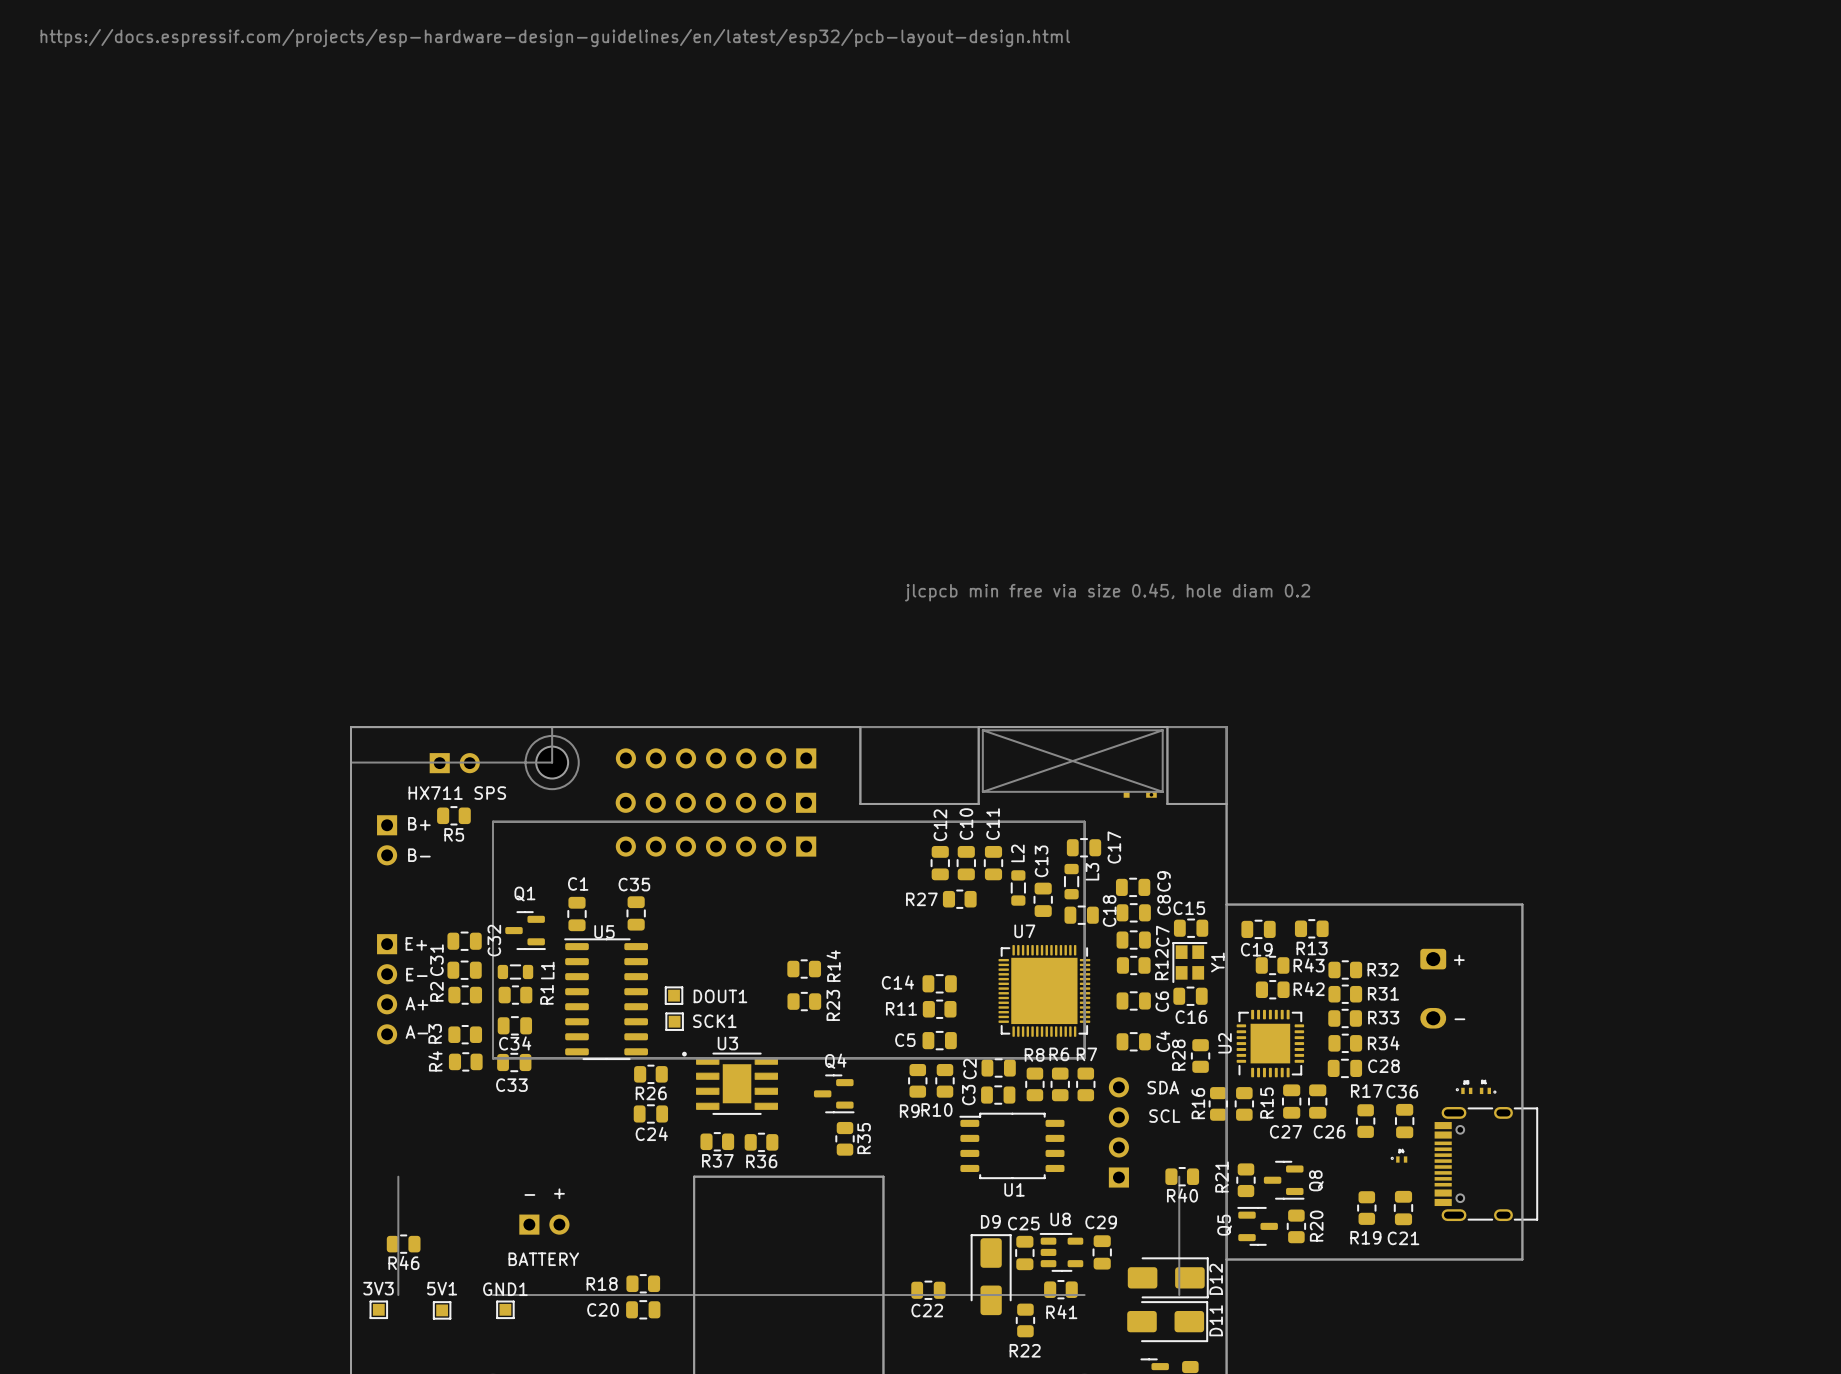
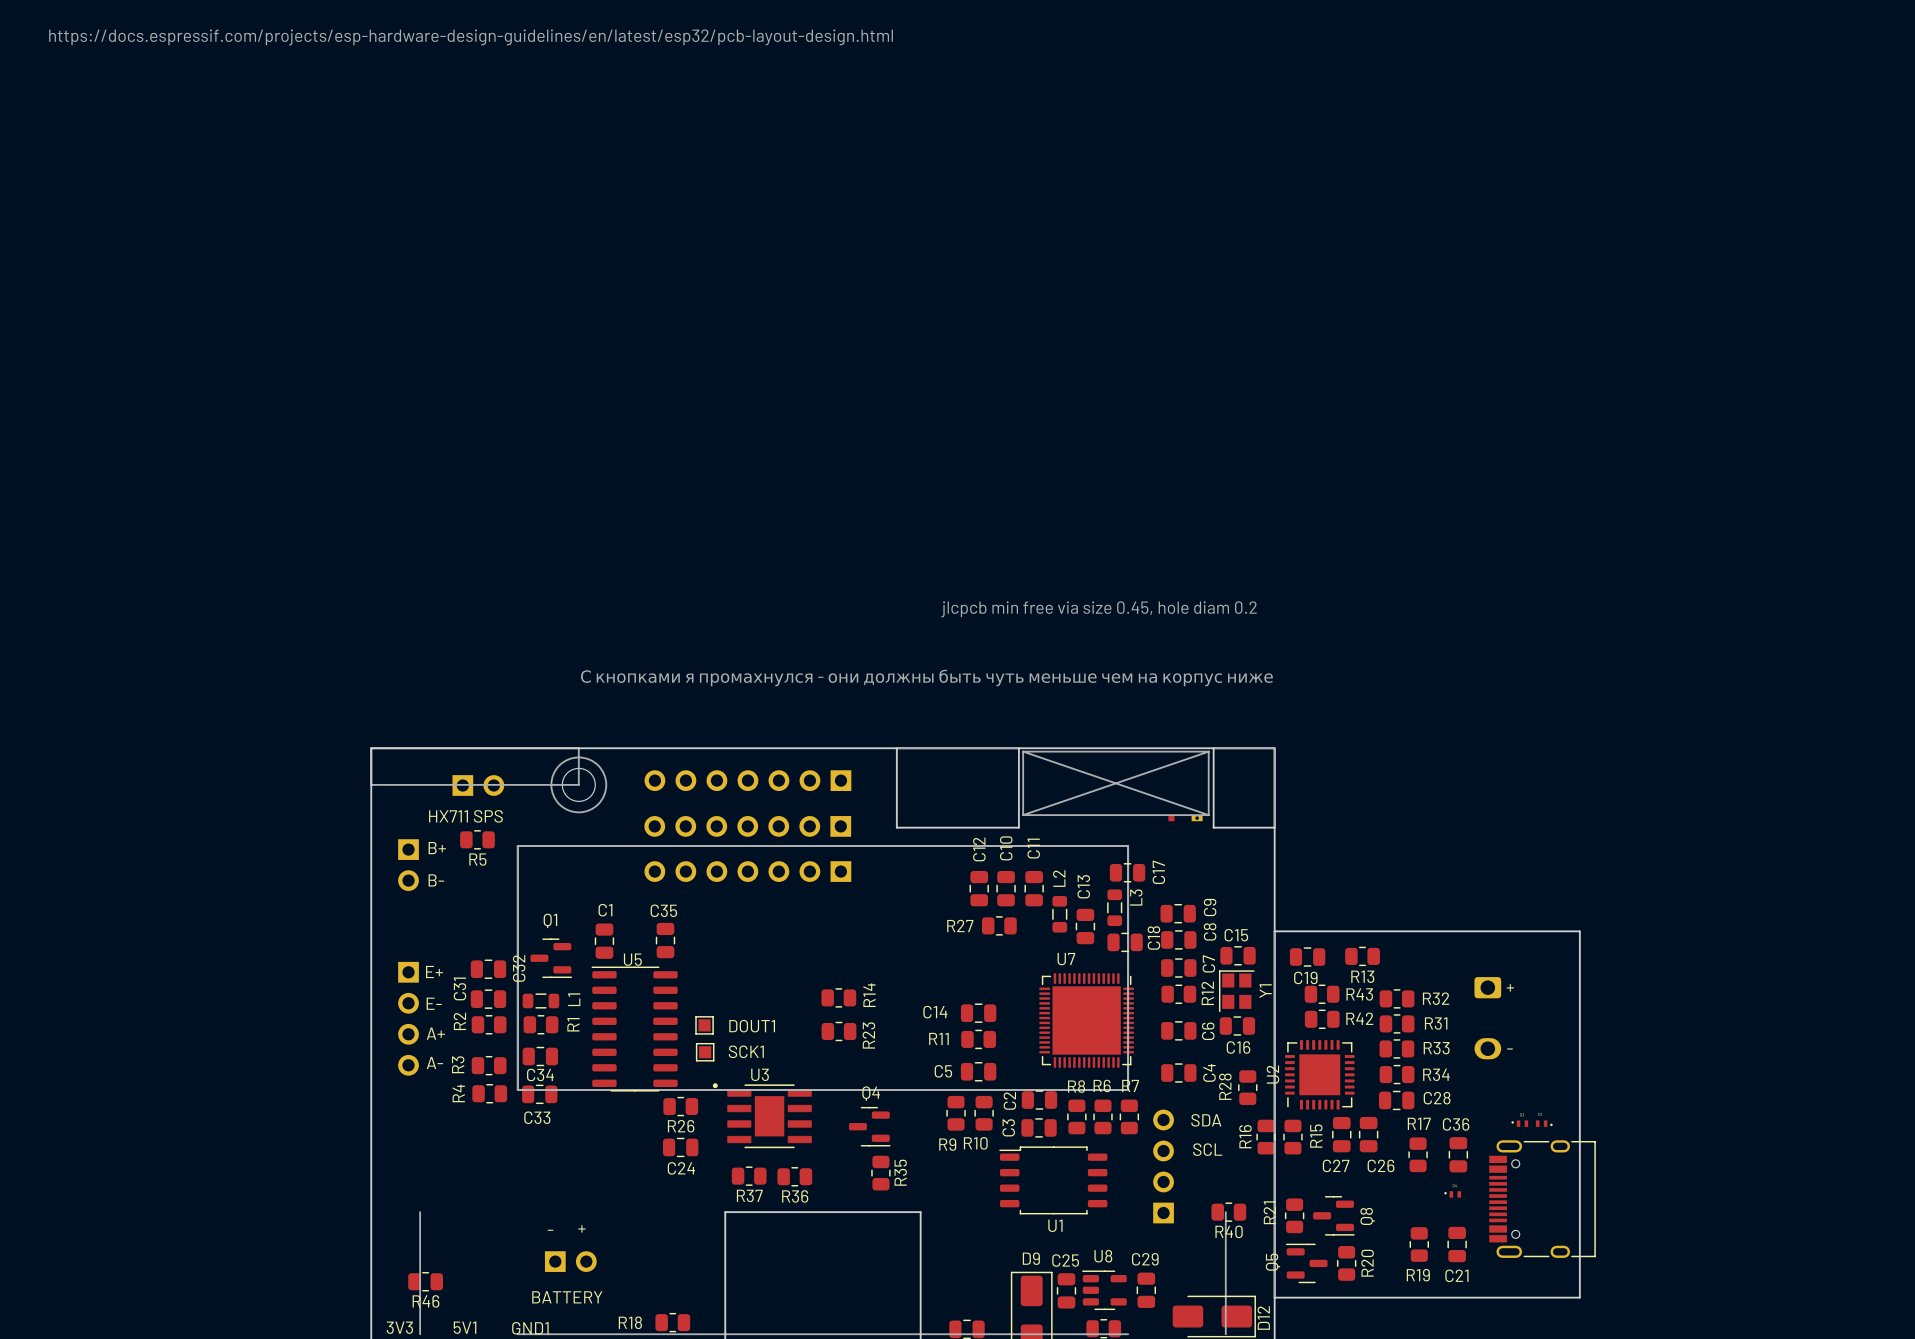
text: none -> С кнопками я промахнулся - они должны быть чуть меньше чем на корпус ниже (926, 677)

